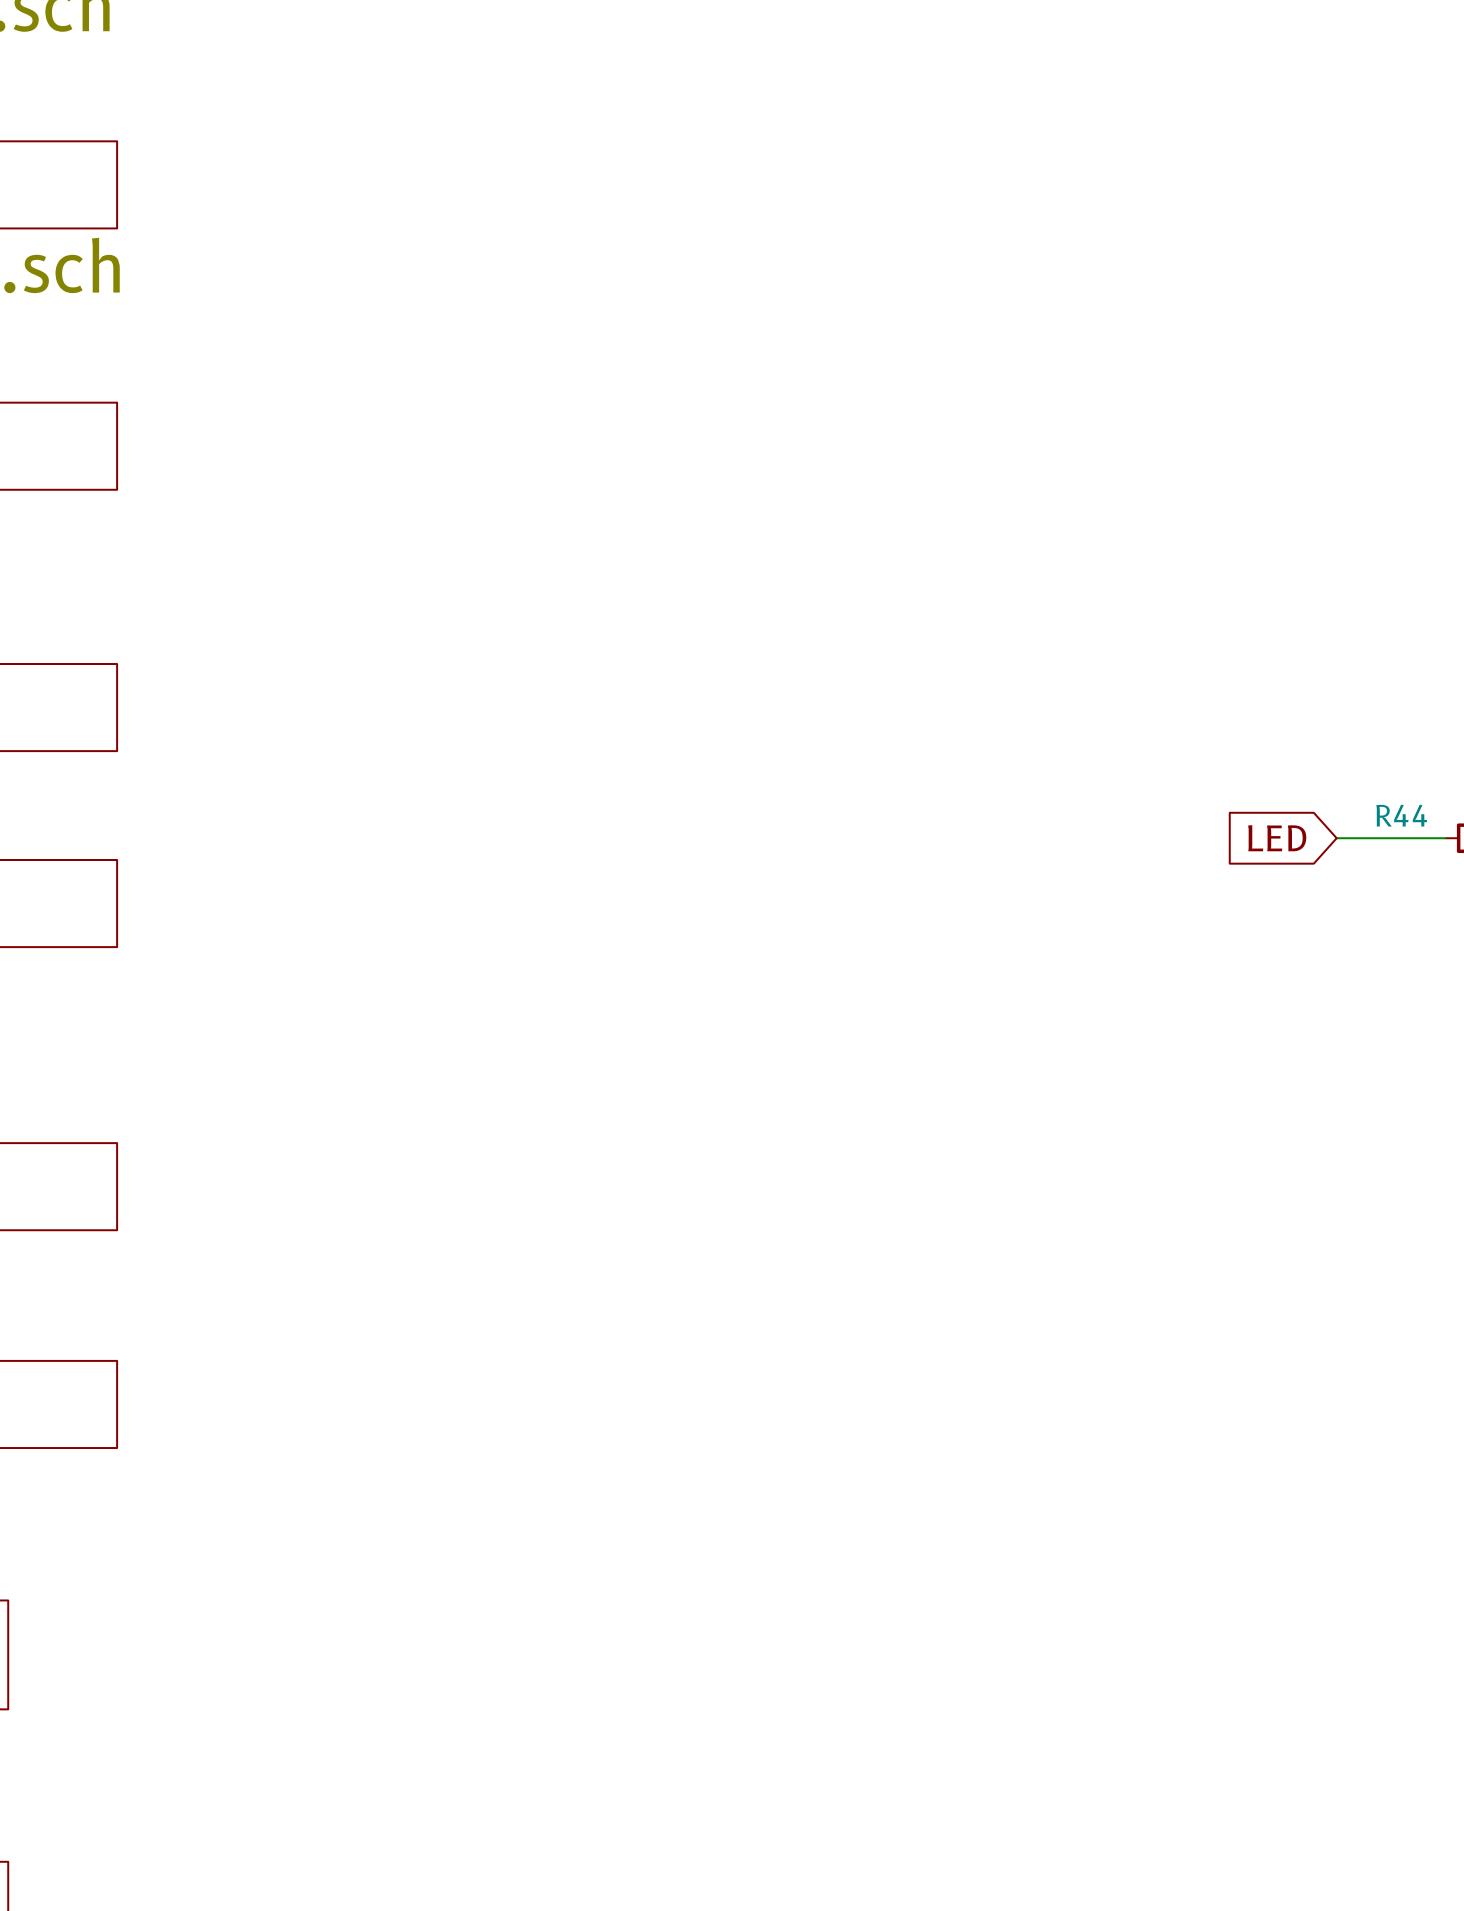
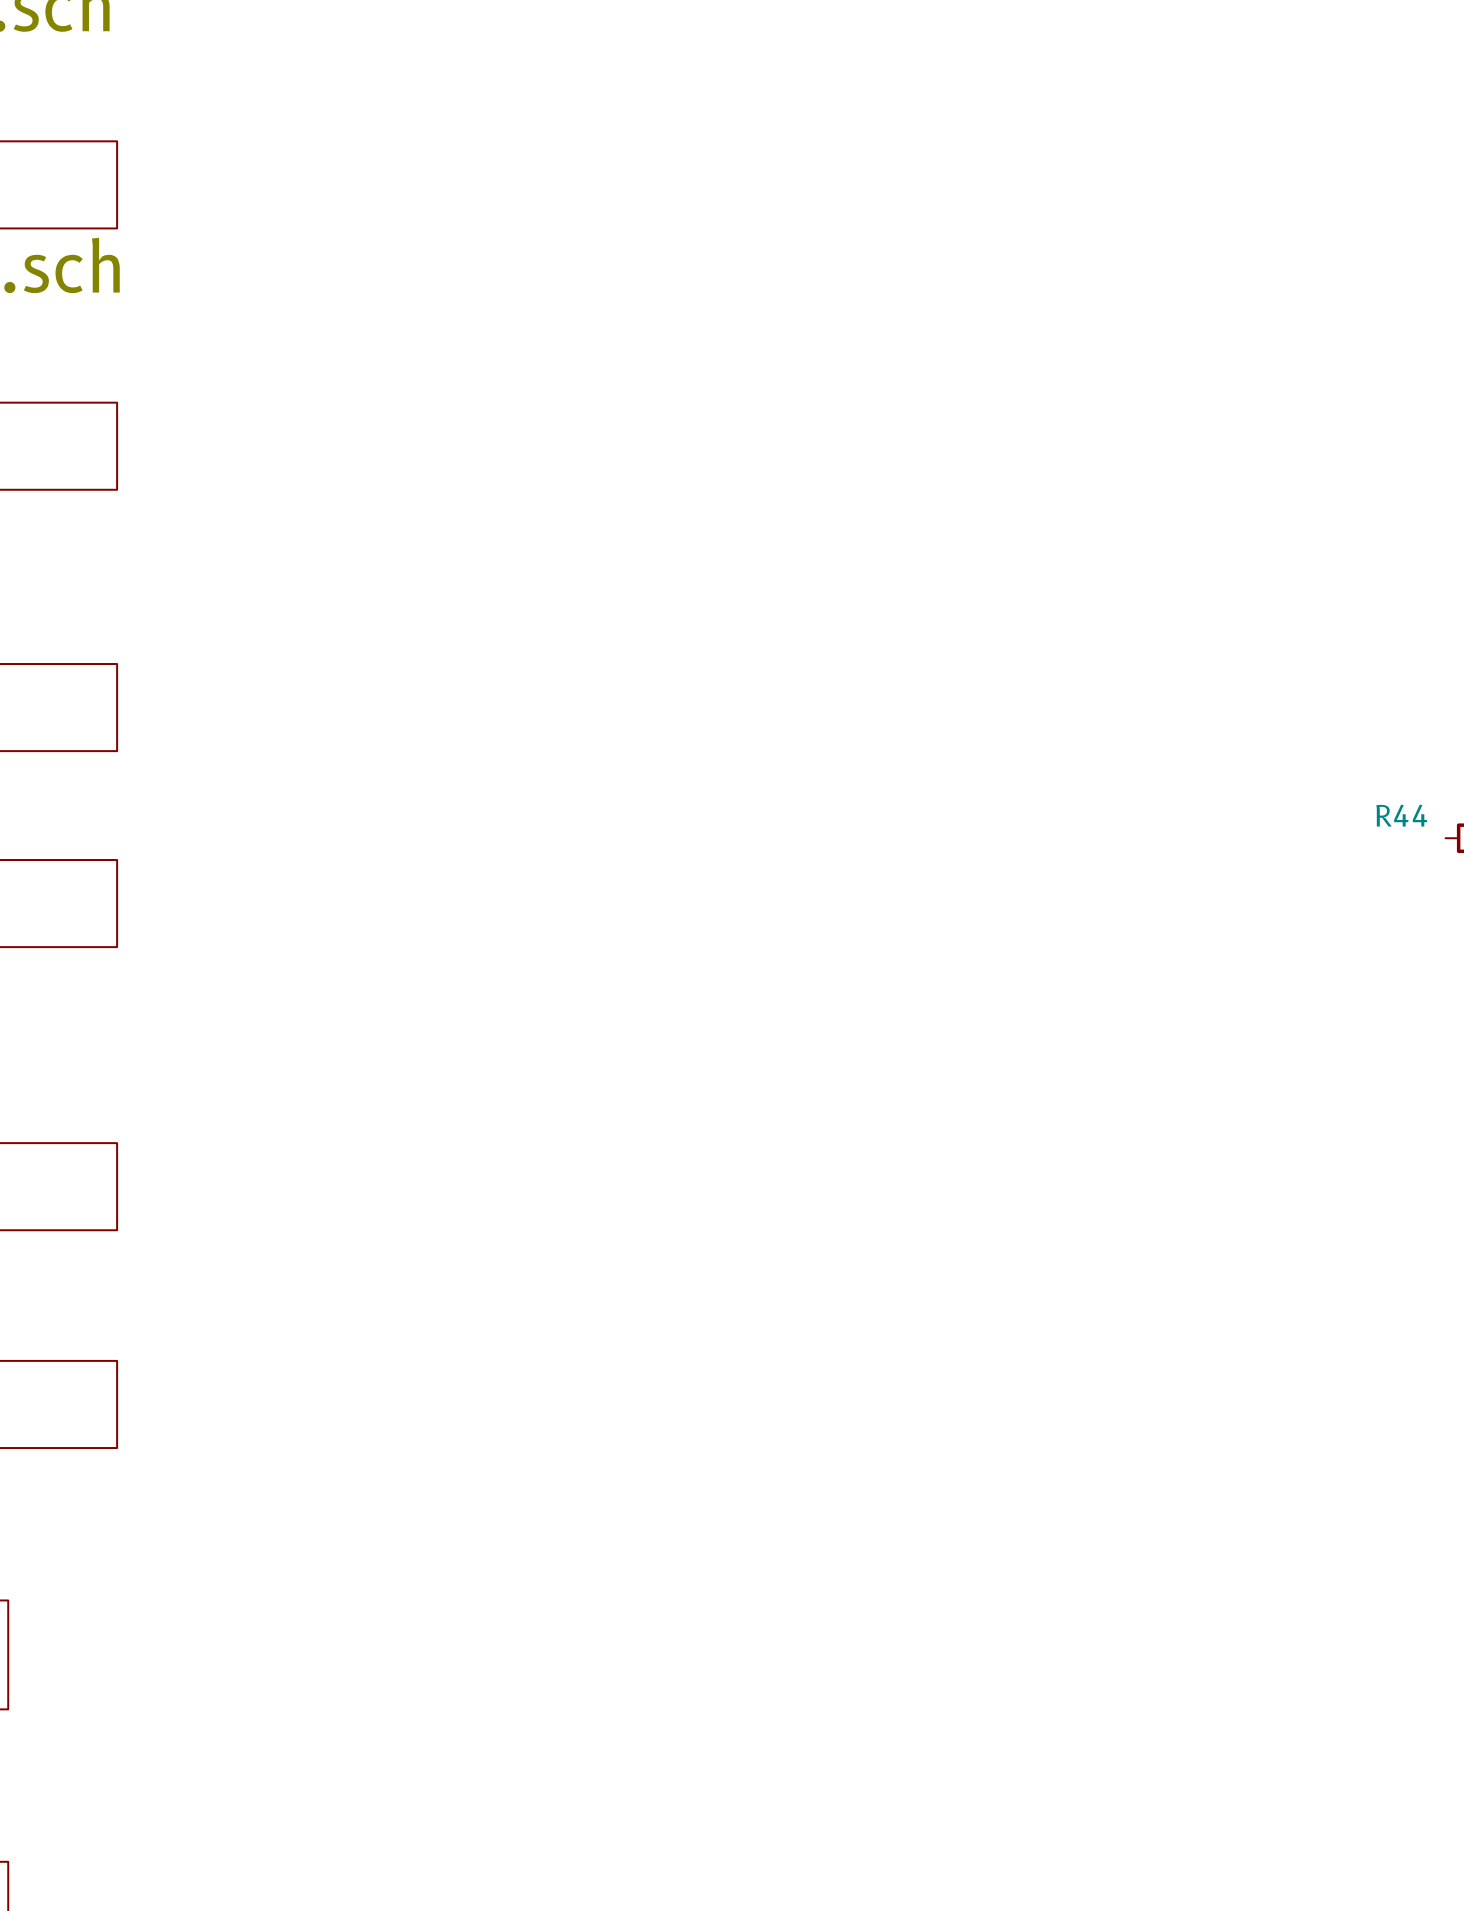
global label: LED (1277, 838) -> none
wire: (1336, 838) (1445, 838) -> none

